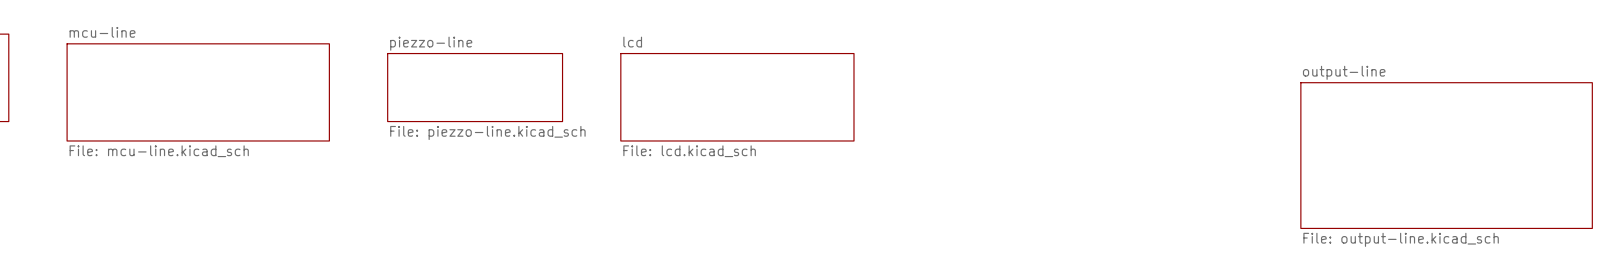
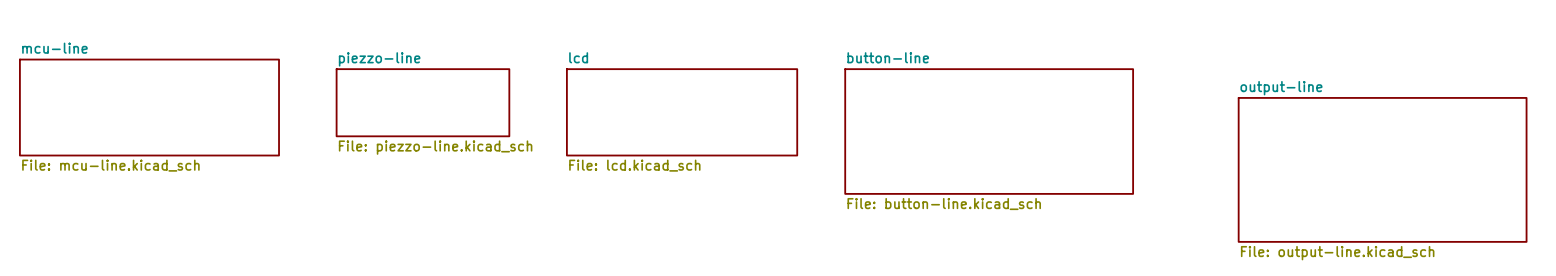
sheet button-line: none -> File: button-line.kicad_sch (989, 131)

